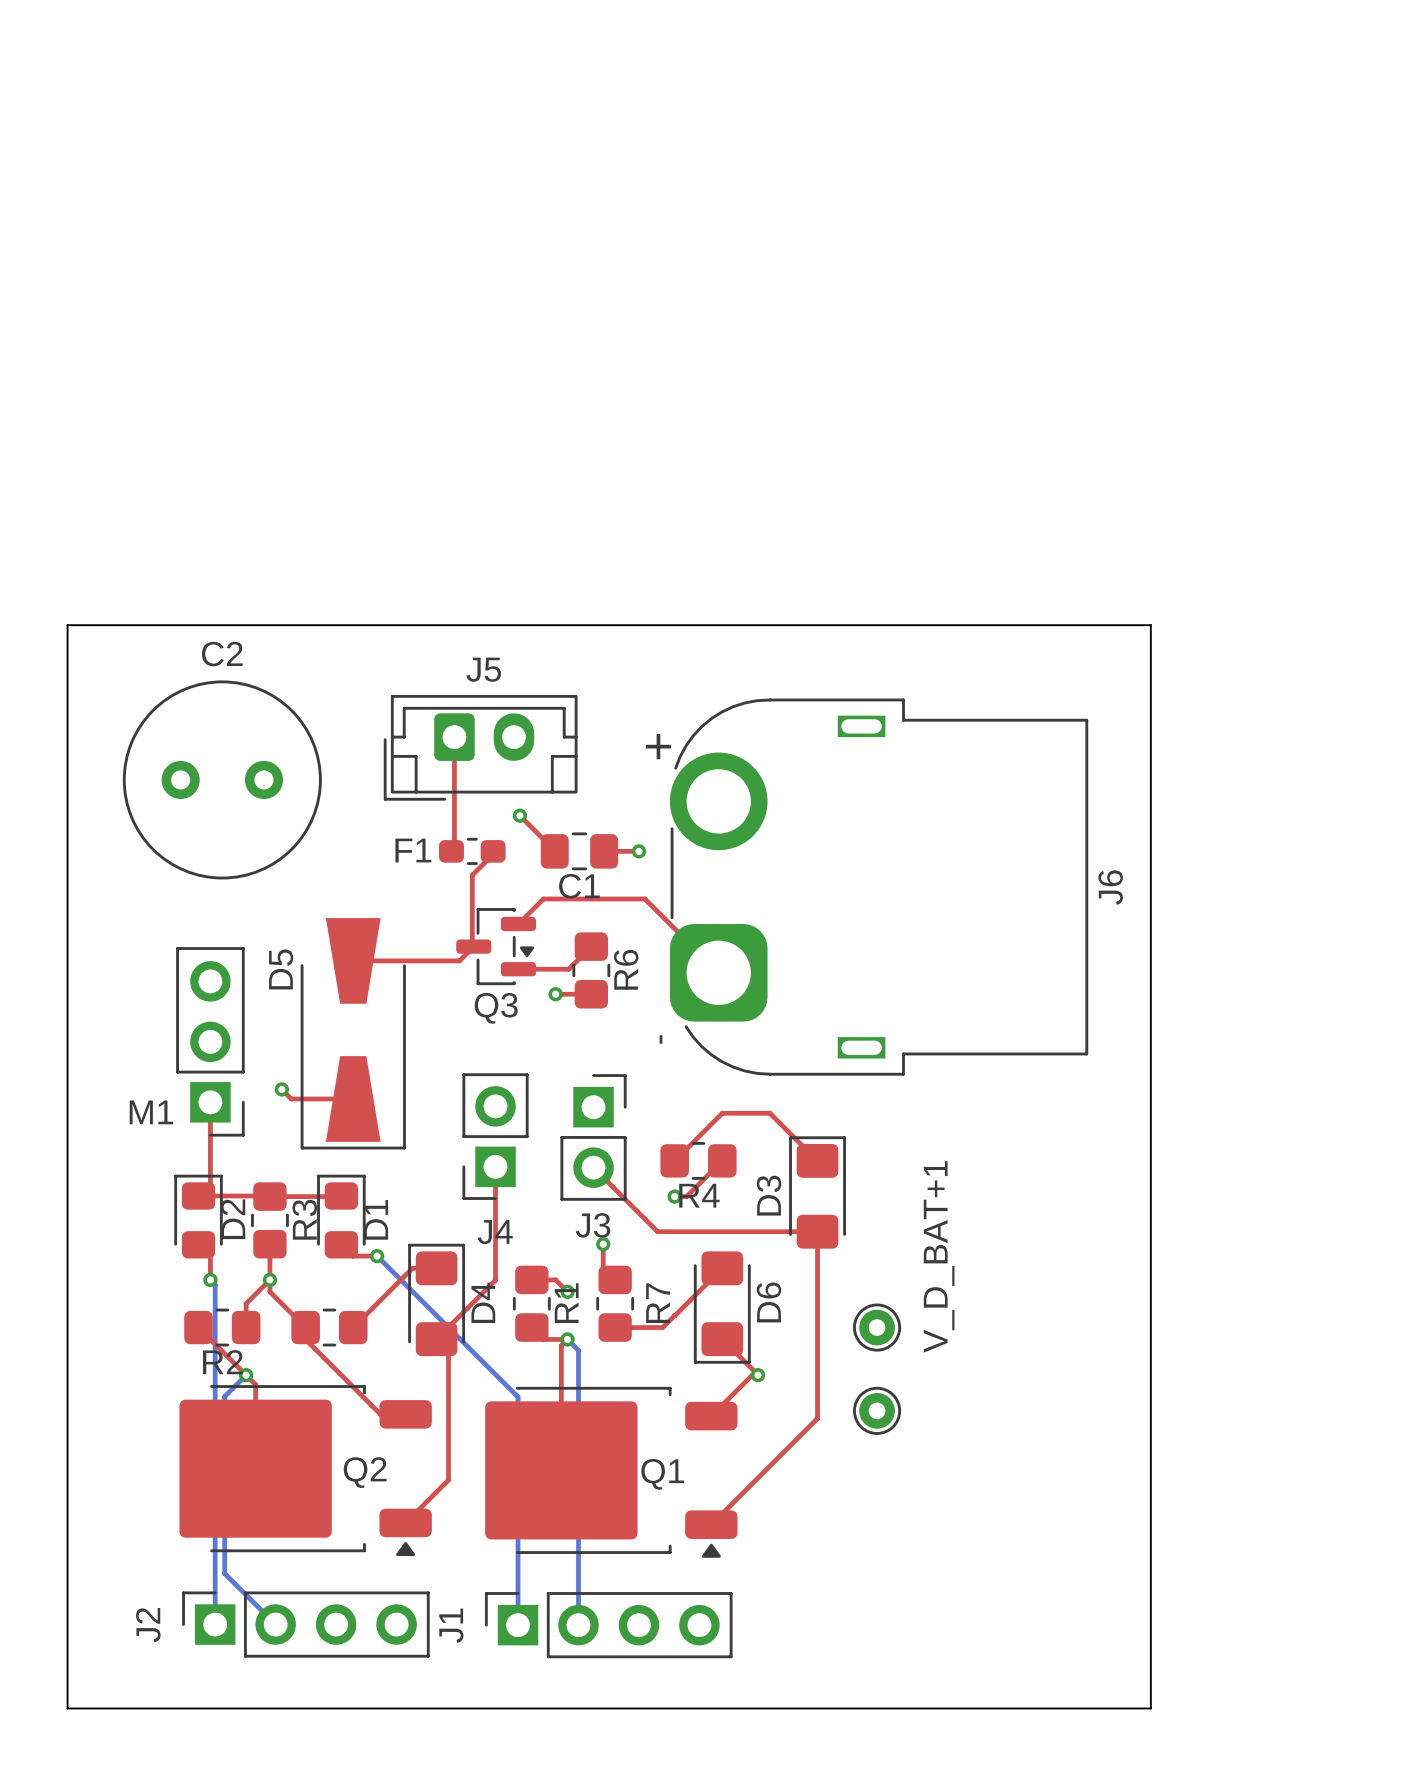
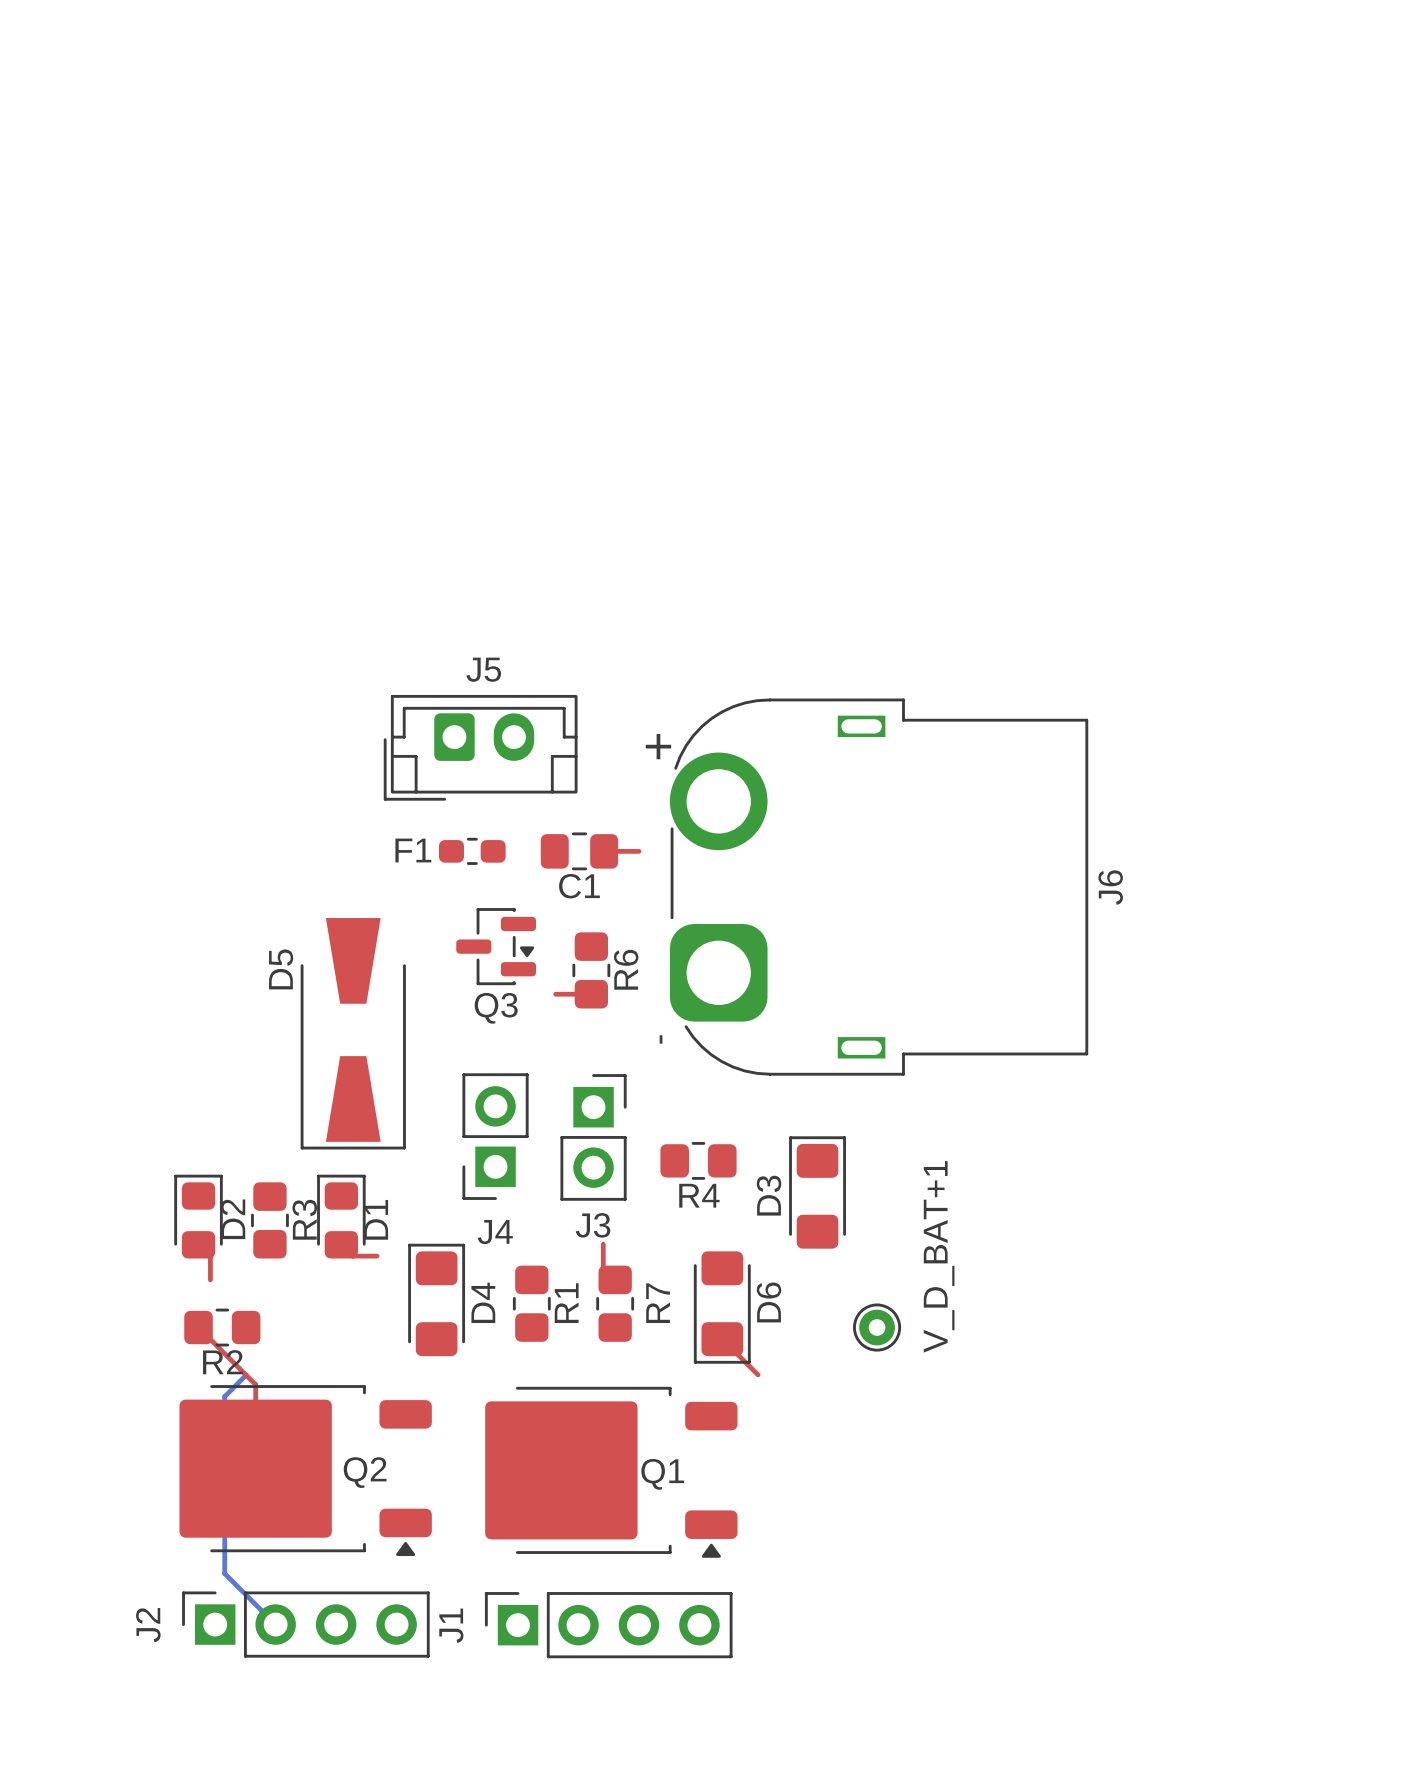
board edge: (67, 625) (1150, 625) (1150, 1708) (67, 1708) (67, 625) -> none
top track: (454, 737) (454, 848) (451, 851) -> none
C2: (222, 779) -> none
top track: (519, 815) (554, 851) -> none
via: (519, 815) -> none
top track: (493, 851) (493, 854) (472, 875) (473, 946) (459, 960) (353, 960) -> none
via: (638, 851) -> none
top track: (518, 923) (543, 898) (644, 898) (718, 972) -> none
top track: (591, 946) (568, 969) (518, 969) -> none
via: (555, 994) -> none
M1: (210, 1041) -> none
top track: (281, 1089) (291, 1098) (353, 1098) -> none
via: (281, 1089) -> none
top track: (210, 1102) (210, 1184) (198, 1196) (341, 1196) -> none
top track: (674, 1160) (722, 1113) (769, 1113) (817, 1160) -> none
top track: (722, 1160) (686, 1196) (674, 1196) -> none
top track: (495, 1166) (495, 1280) (436, 1339) (448, 1351) (448, 1480) (405, 1522) -> none
top track: (593, 1167) (657, 1231) (817, 1231) (817, 1418) (711, 1524) -> none
via: (674, 1196) -> none
top track: (269, 1244) (269, 1291) (305, 1327) (305, 1339) (380, 1414) (405, 1414) -> none
via: (603, 1244) -> none
bottom track: (377, 1256) (518, 1397) (518, 1625) -> none
via: (377, 1256) -> none
top track: (436, 1268) (412, 1268) (353, 1327) -> none
top track: (722, 1268) (674, 1315) -> none
bottom track: (210, 1279) (215, 1284) (215, 1624) -> none
via: (210, 1279) -> none
top track: (269, 1279) (246, 1303) (246, 1327) -> none
via: (269, 1279) -> none
top track: (531, 1279) (555, 1279) (567, 1291) -> none
via: (567, 1291) -> none
top track: (674, 1315) (662, 1327) (615, 1327) -> none
part: (329, 1327) -> none
top track: (531, 1327) (543, 1339) (567, 1339) (561, 1345) (561, 1470) -> none
bottom track: (567, 1339) (578, 1350) (578, 1625) -> none
via: (567, 1339) -> none
via: (246, 1375) -> none
top track: (758, 1375) (752, 1375) (711, 1416) -> none
via: (758, 1375) -> none
part: (877, 1410) -> none

